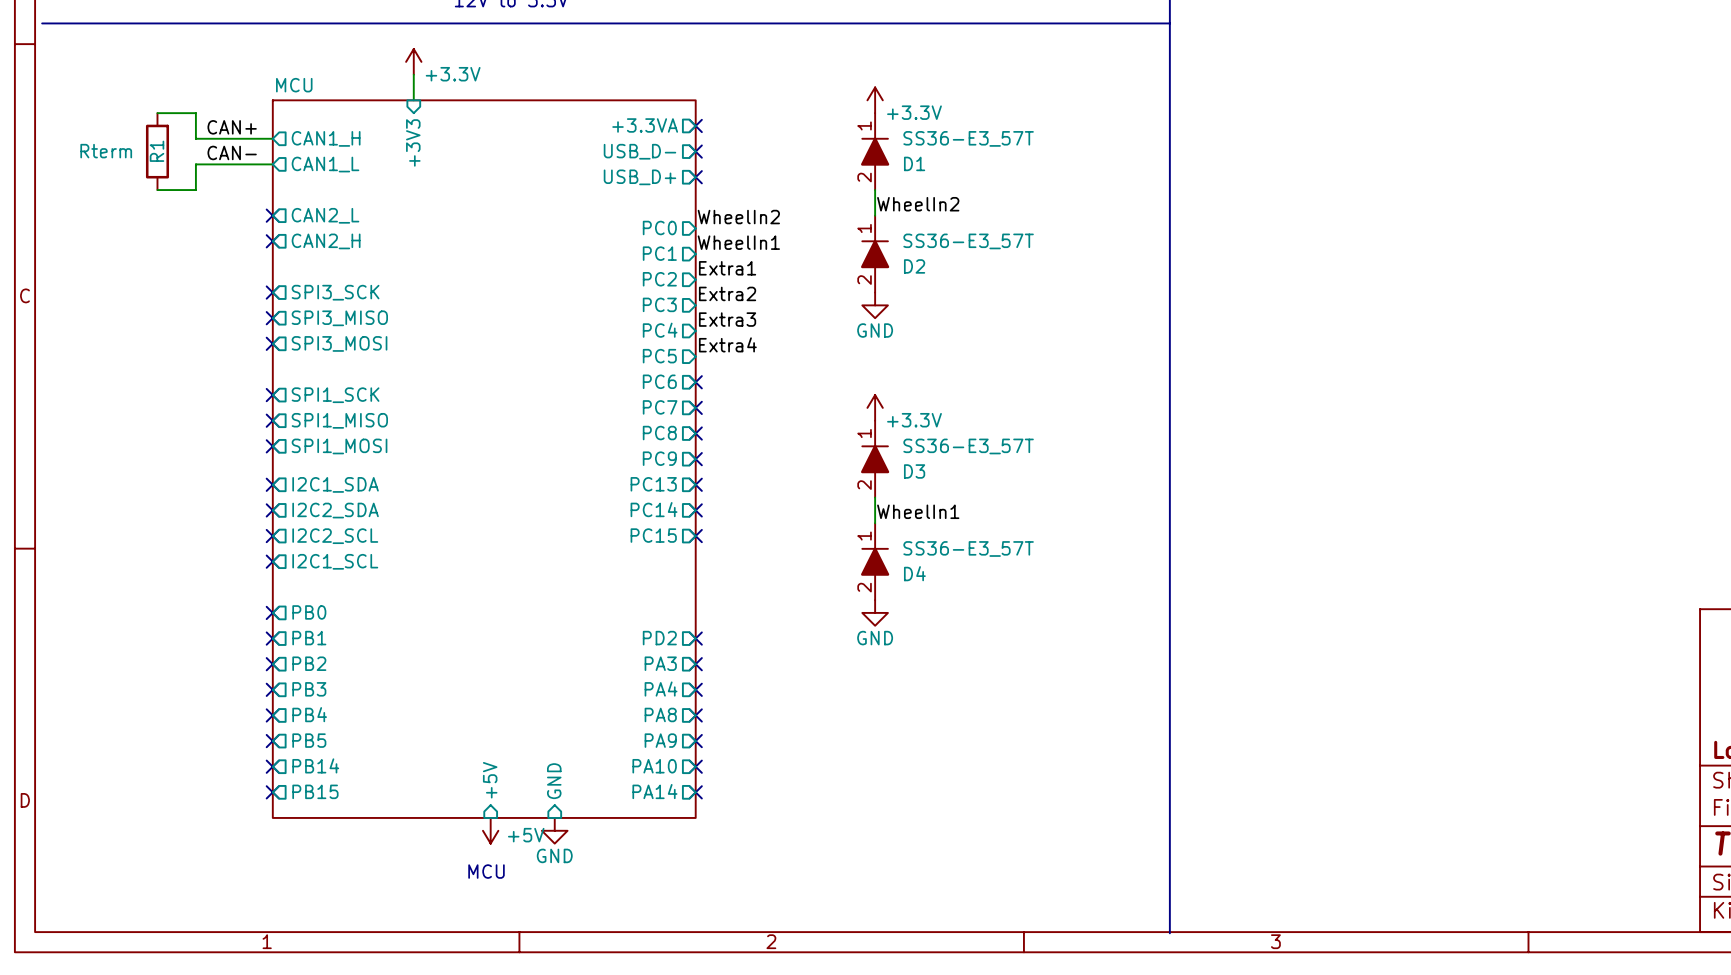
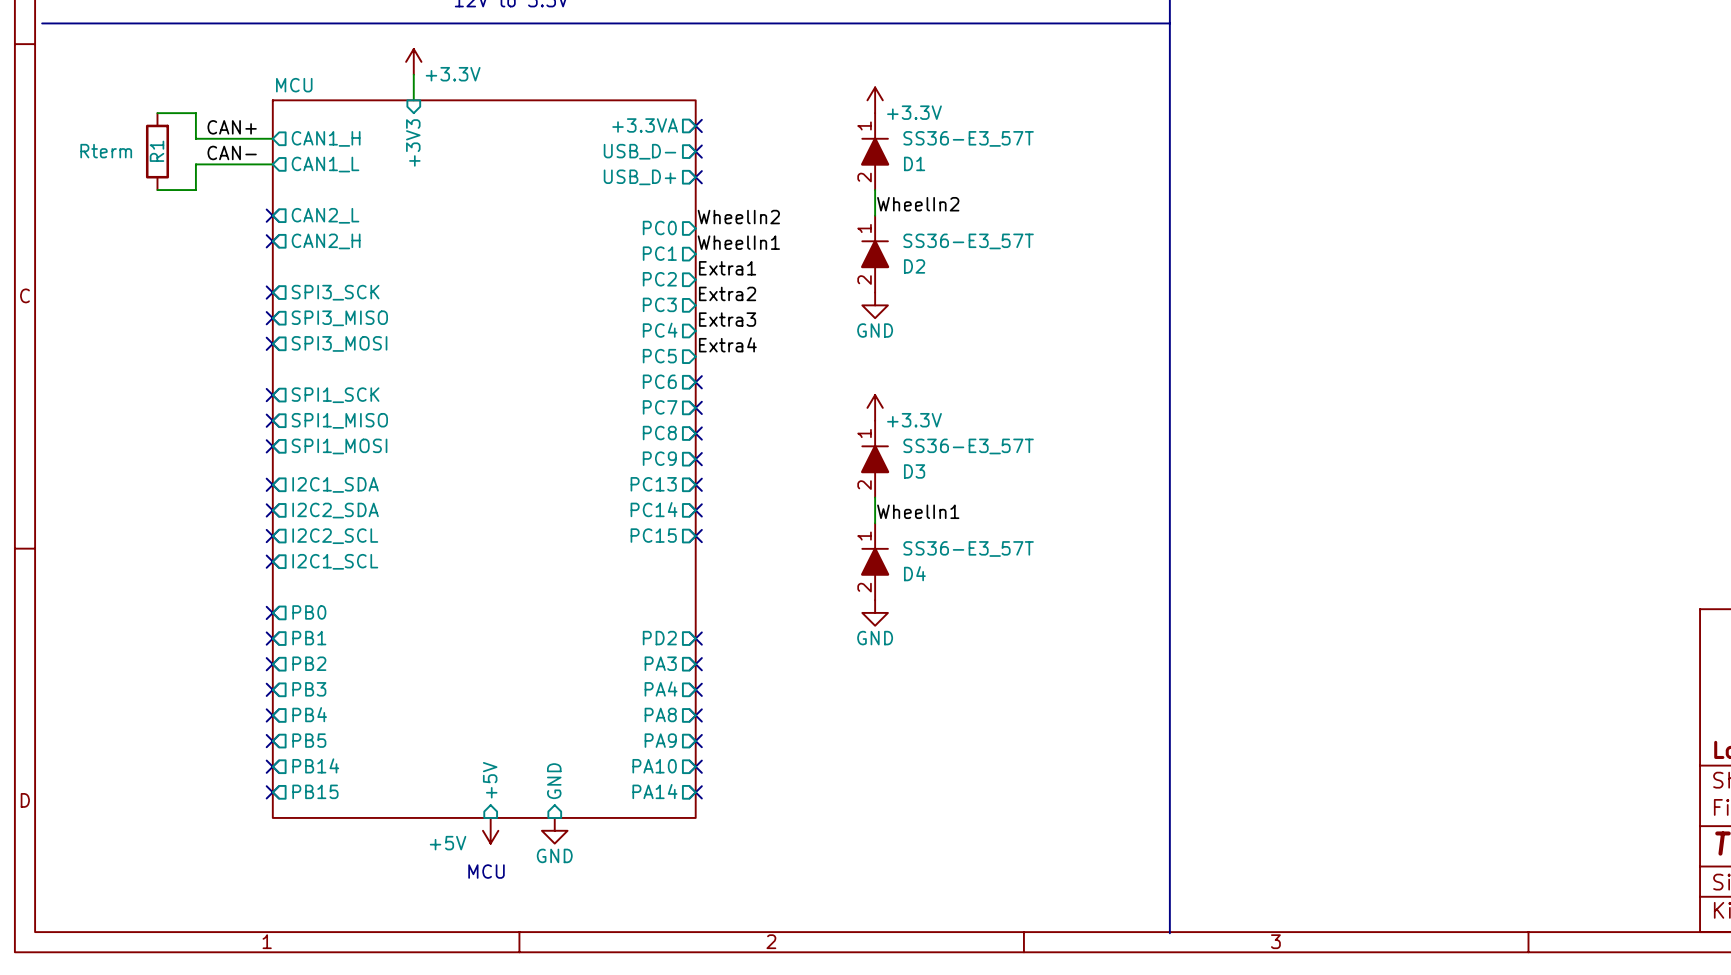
power symbol text position: +5V (526, 835) -> +5V (448, 843)

